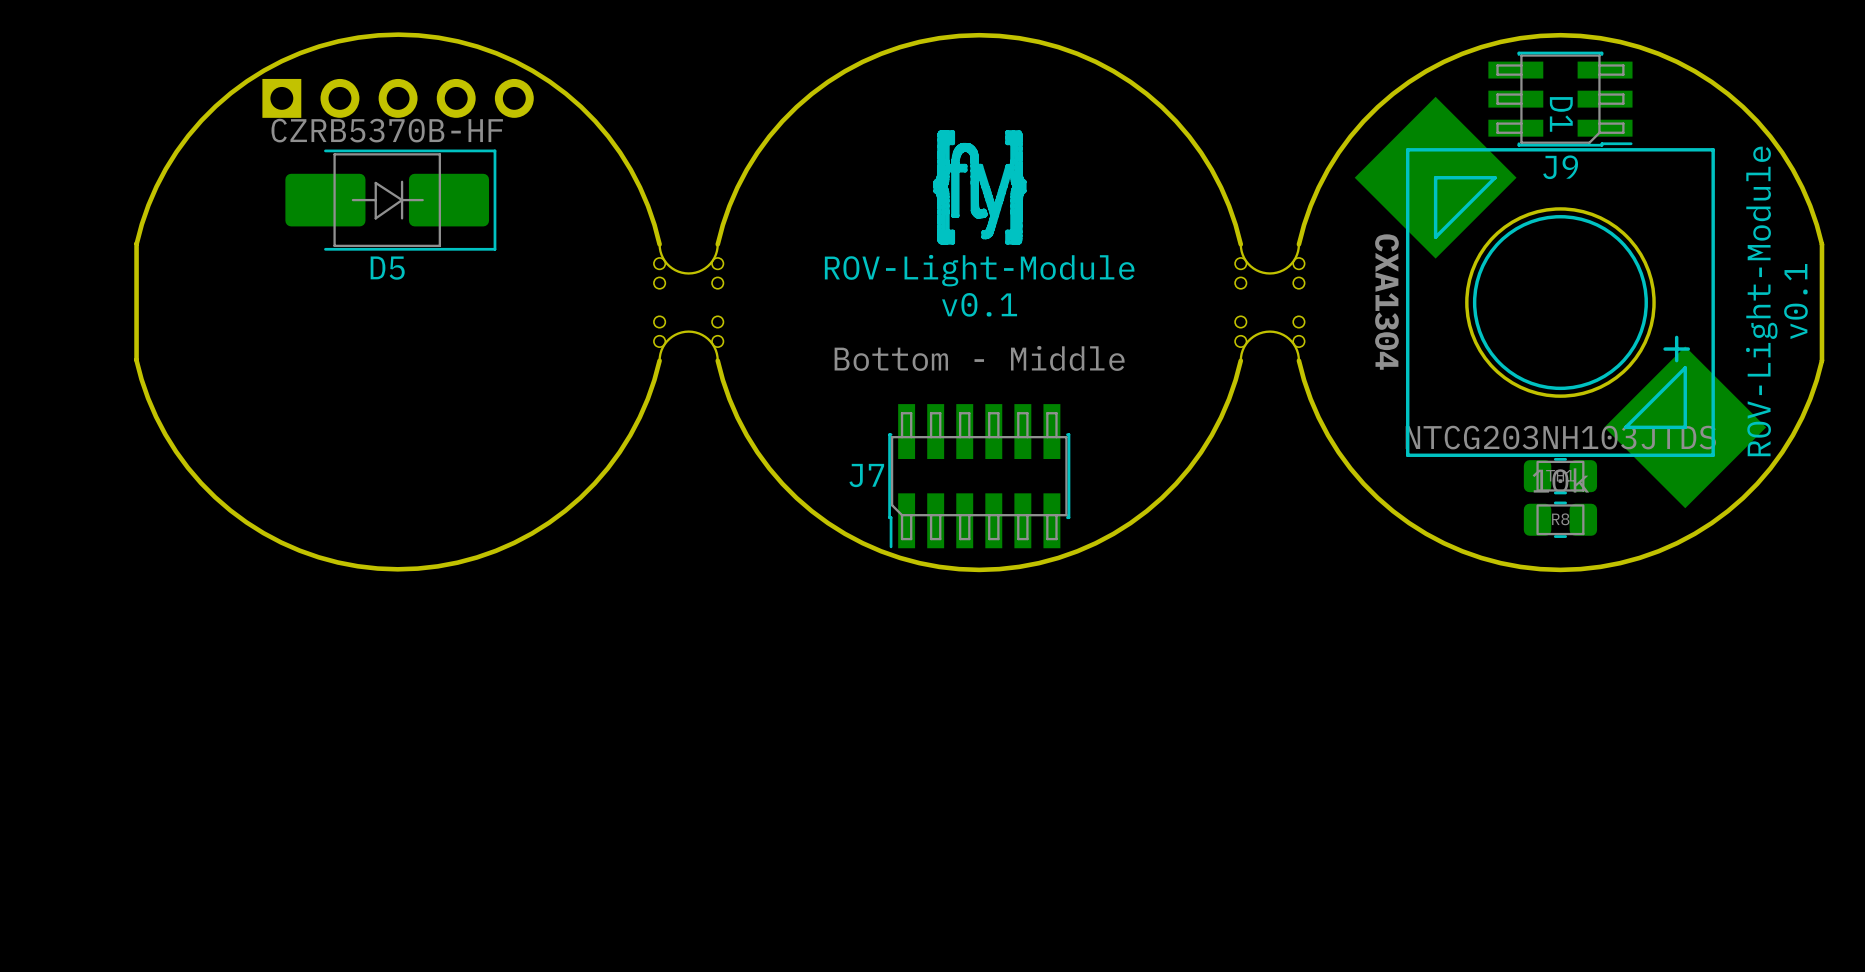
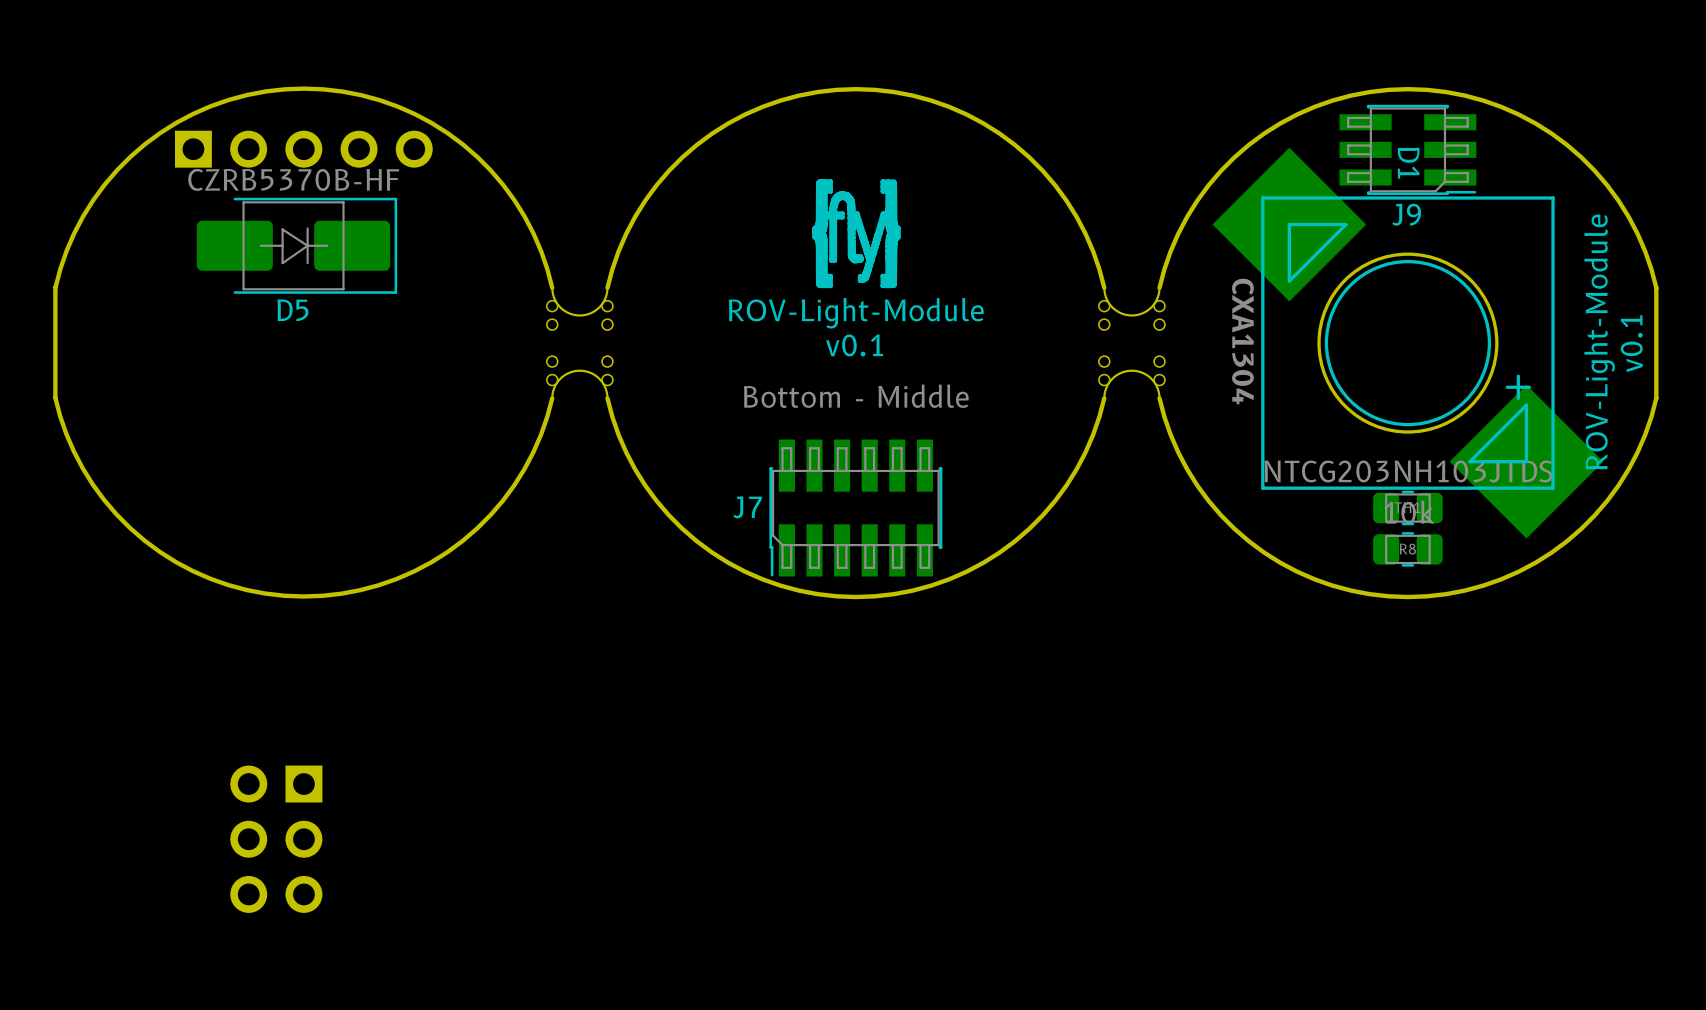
part: none -> (276, 839)

